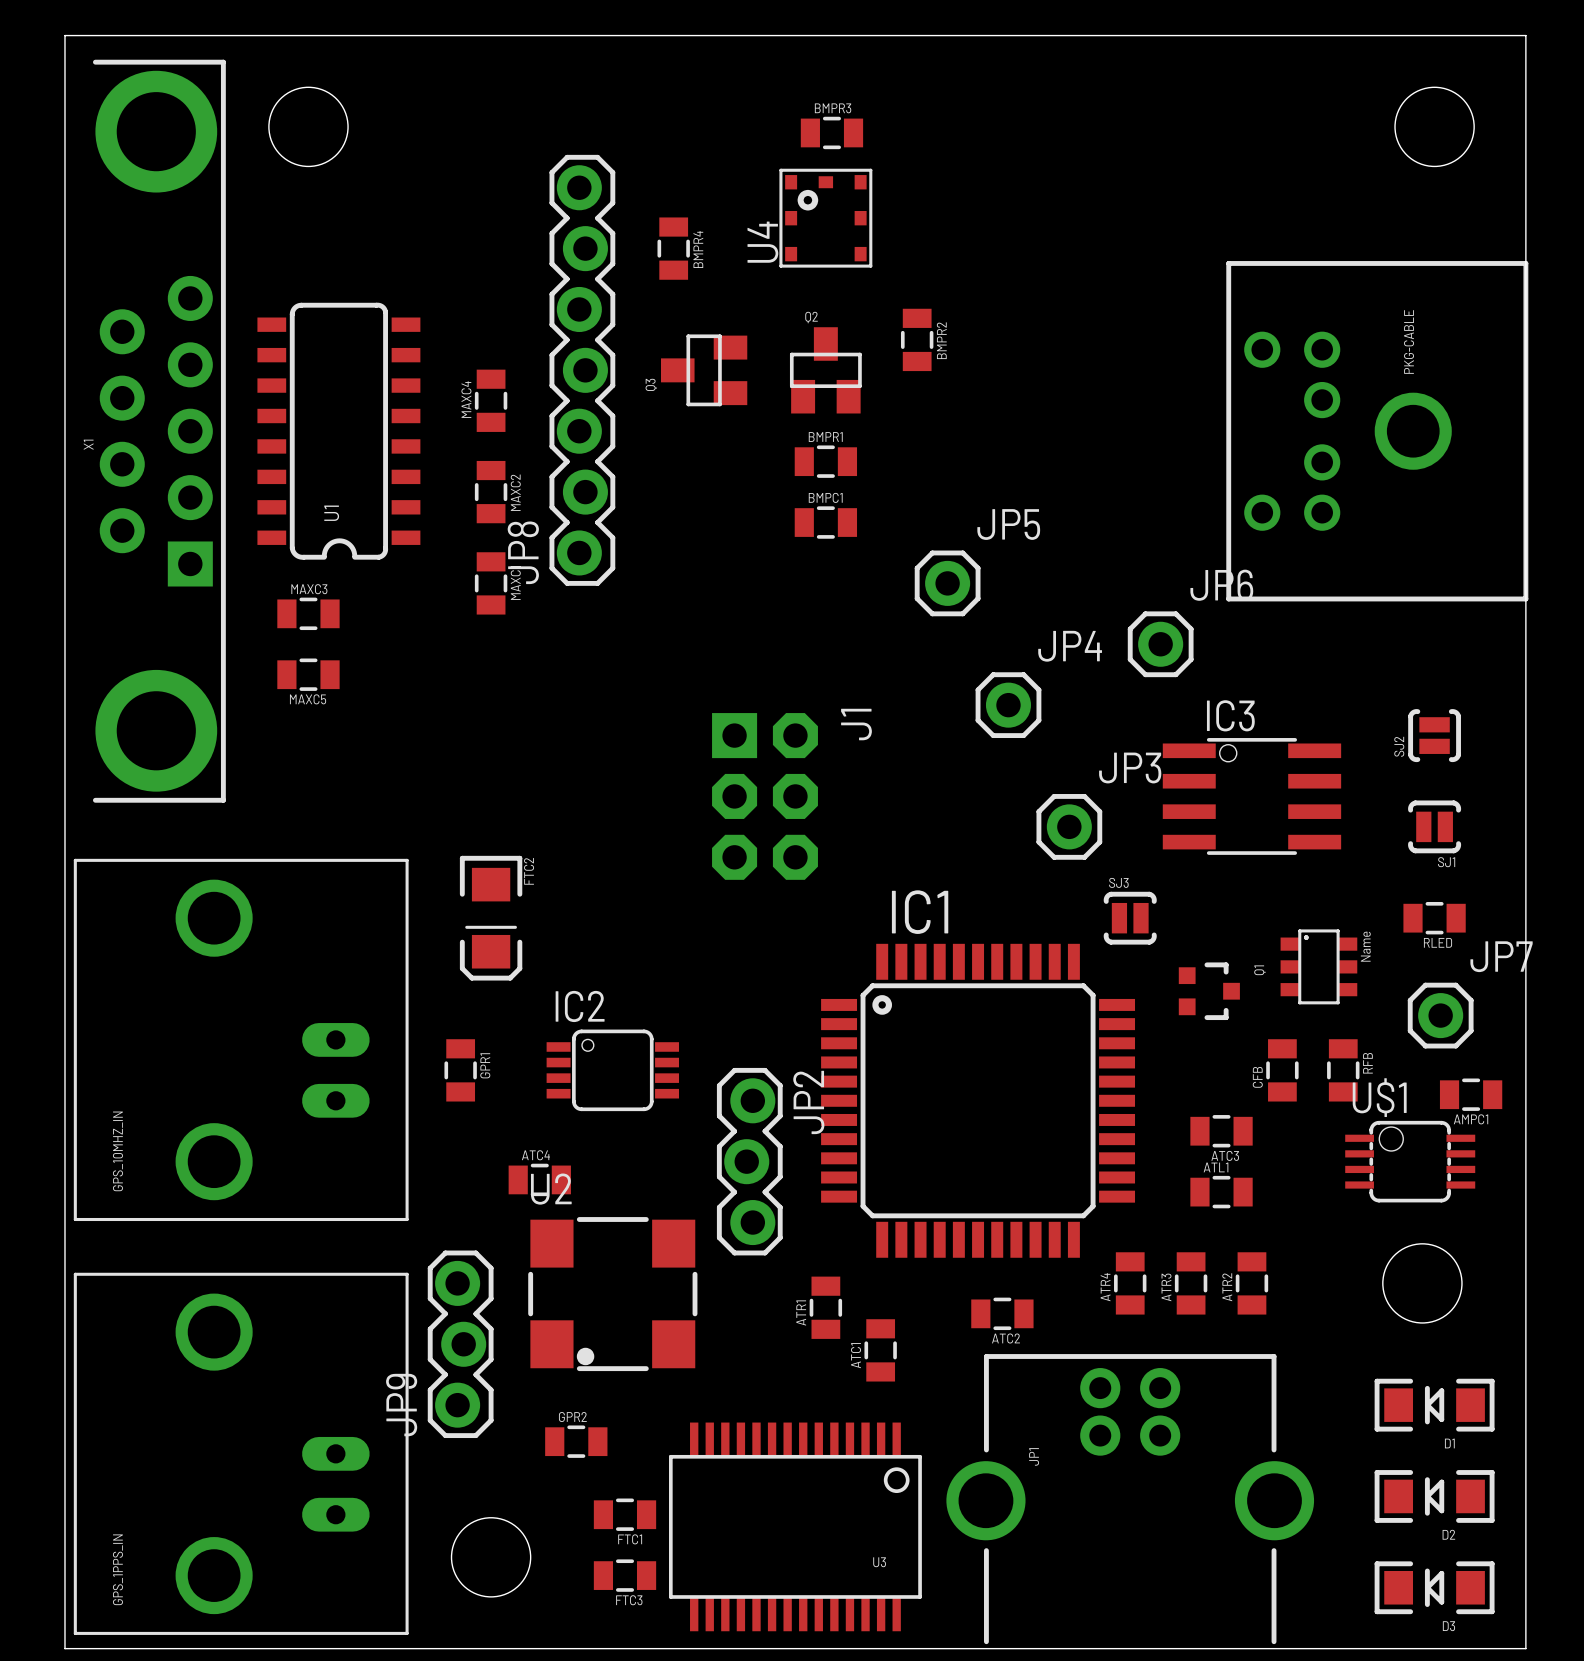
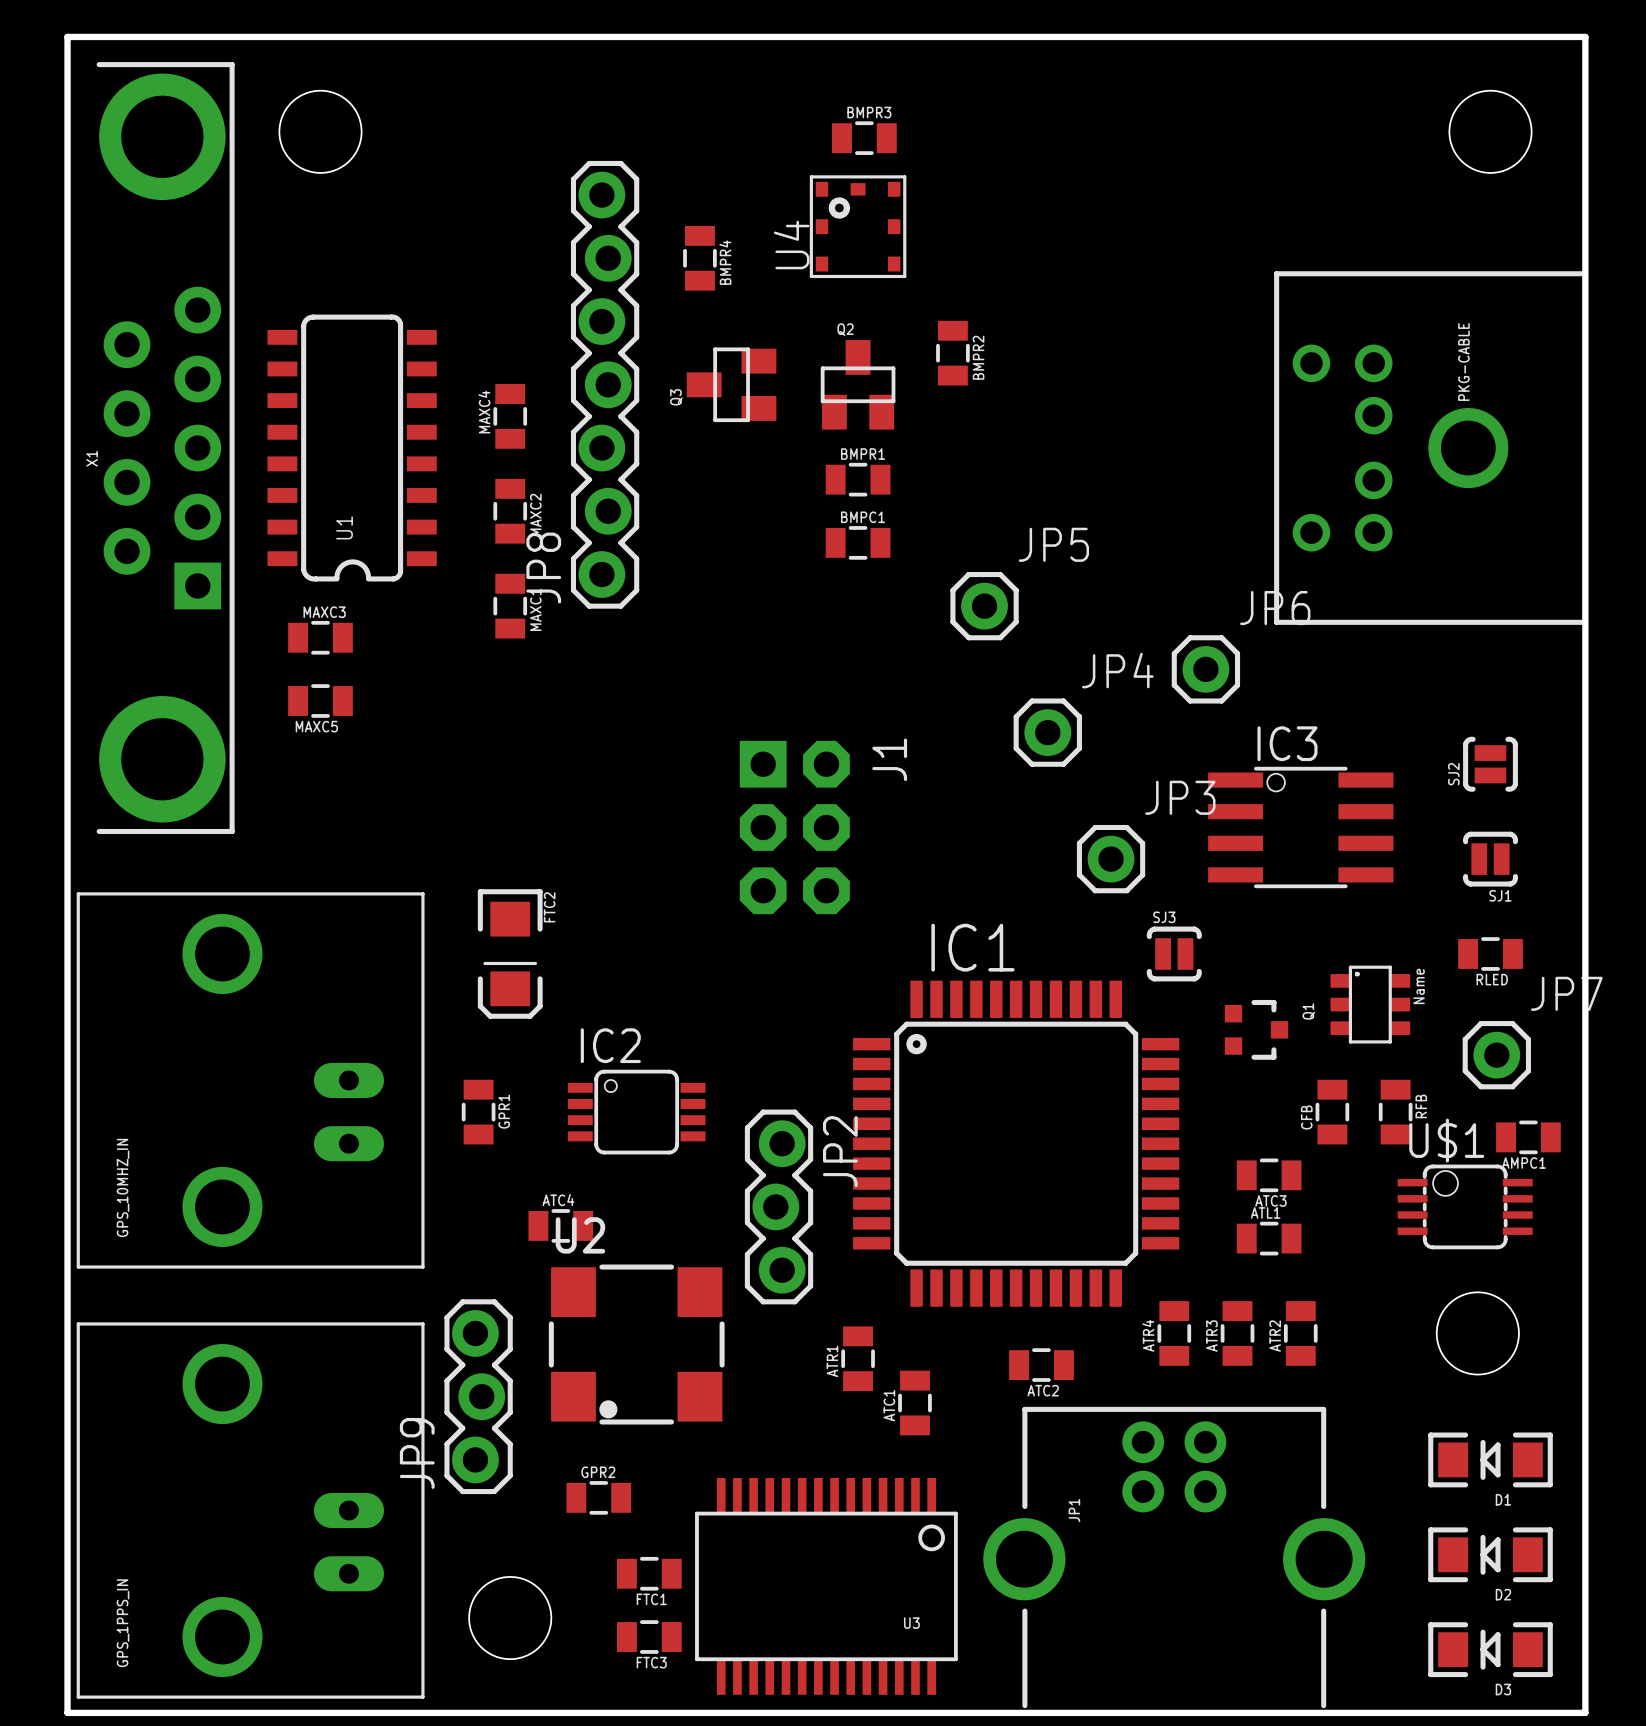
board edge width: thin (64, 35) (1525, 35) (1525, 1648) (64, 1648) (64, 35) -> thick (67, 36) (1585, 36) (1585, 1712) (67, 1712) (67, 36)

